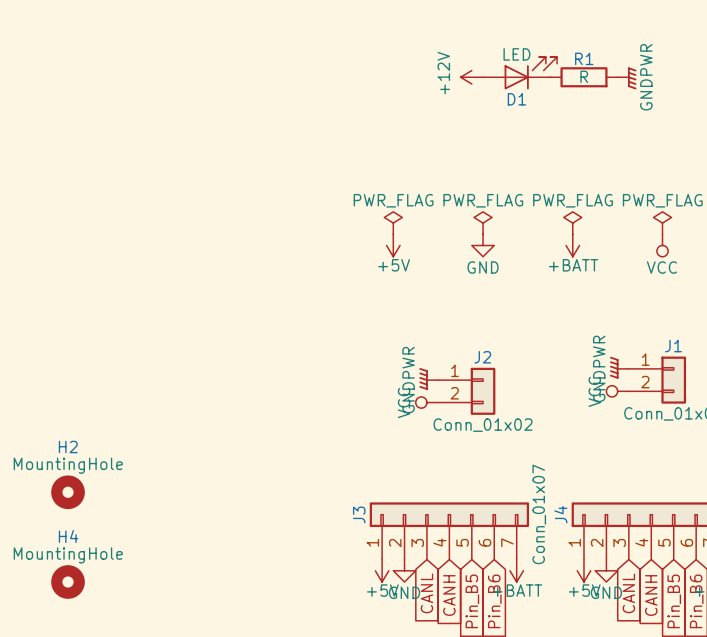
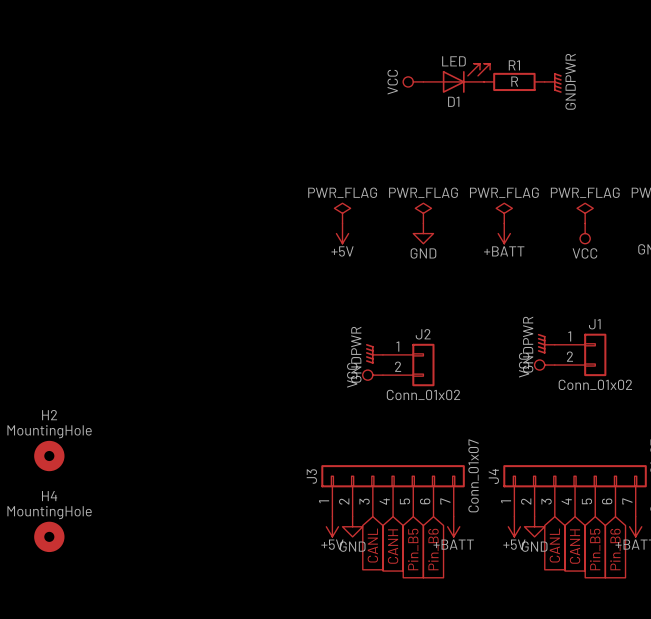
power symbol: +12V (471, 77) -> VCC (413, 81)

